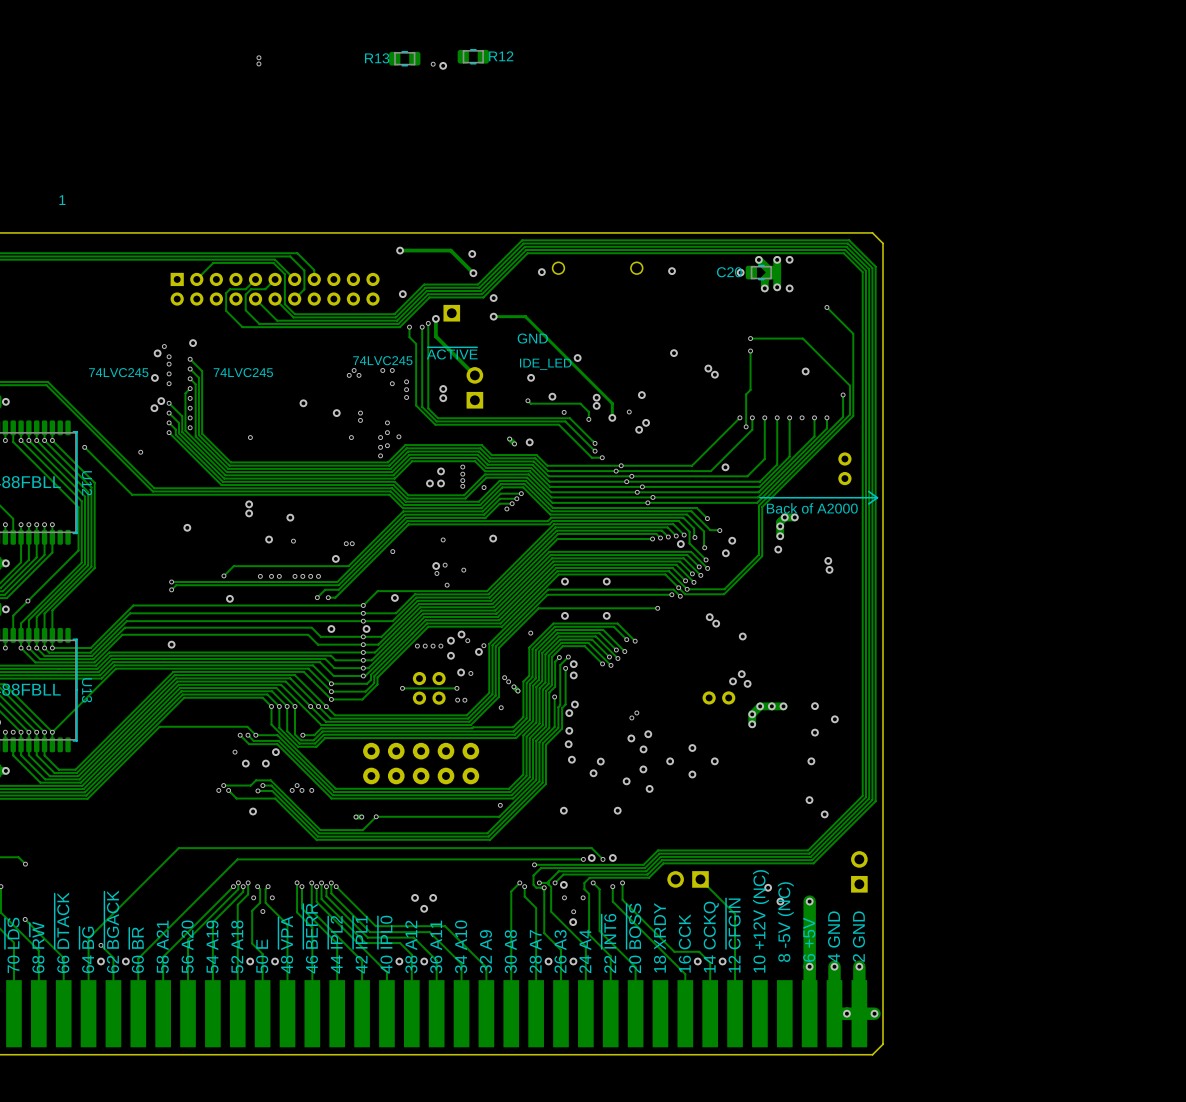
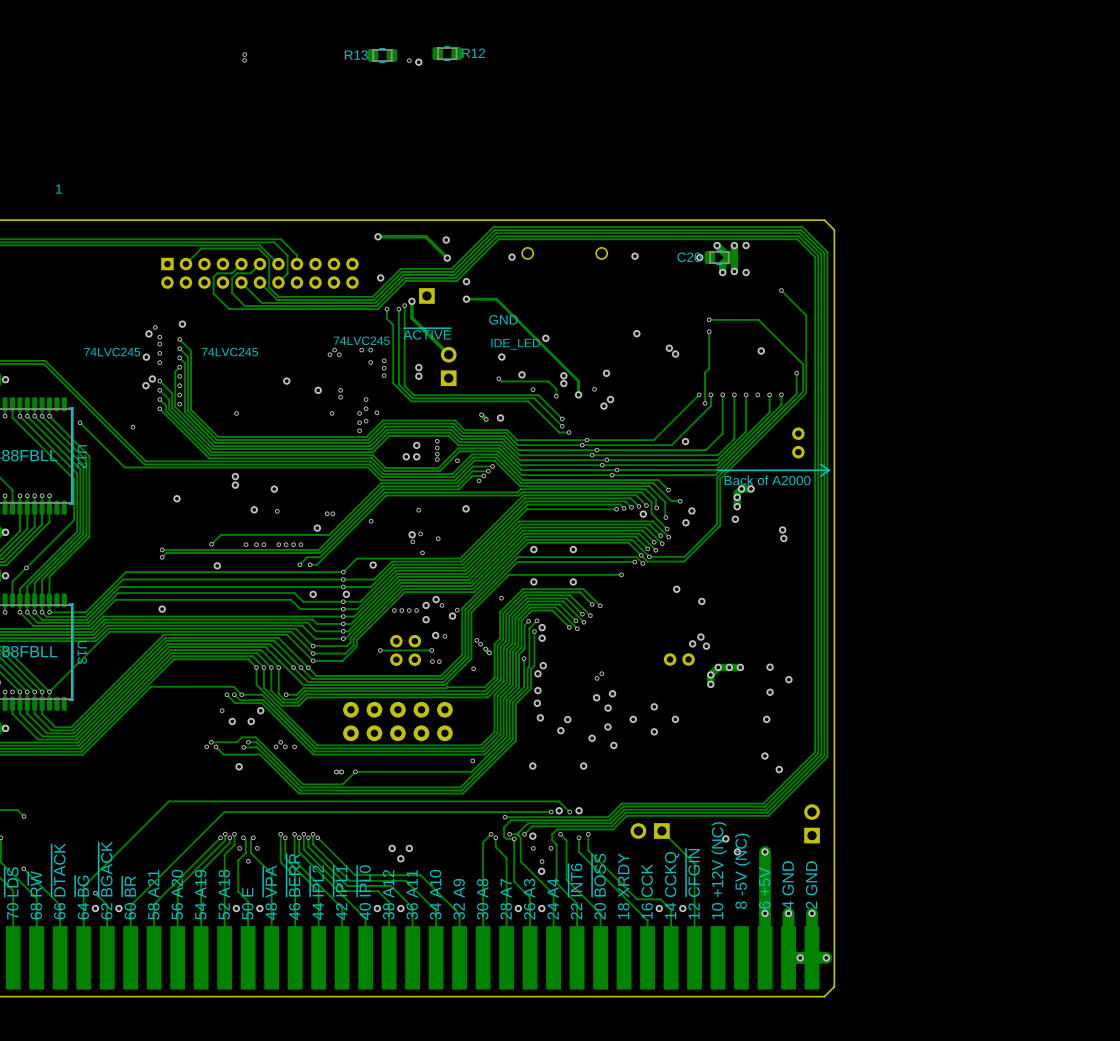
via: (709, 617) -> none

